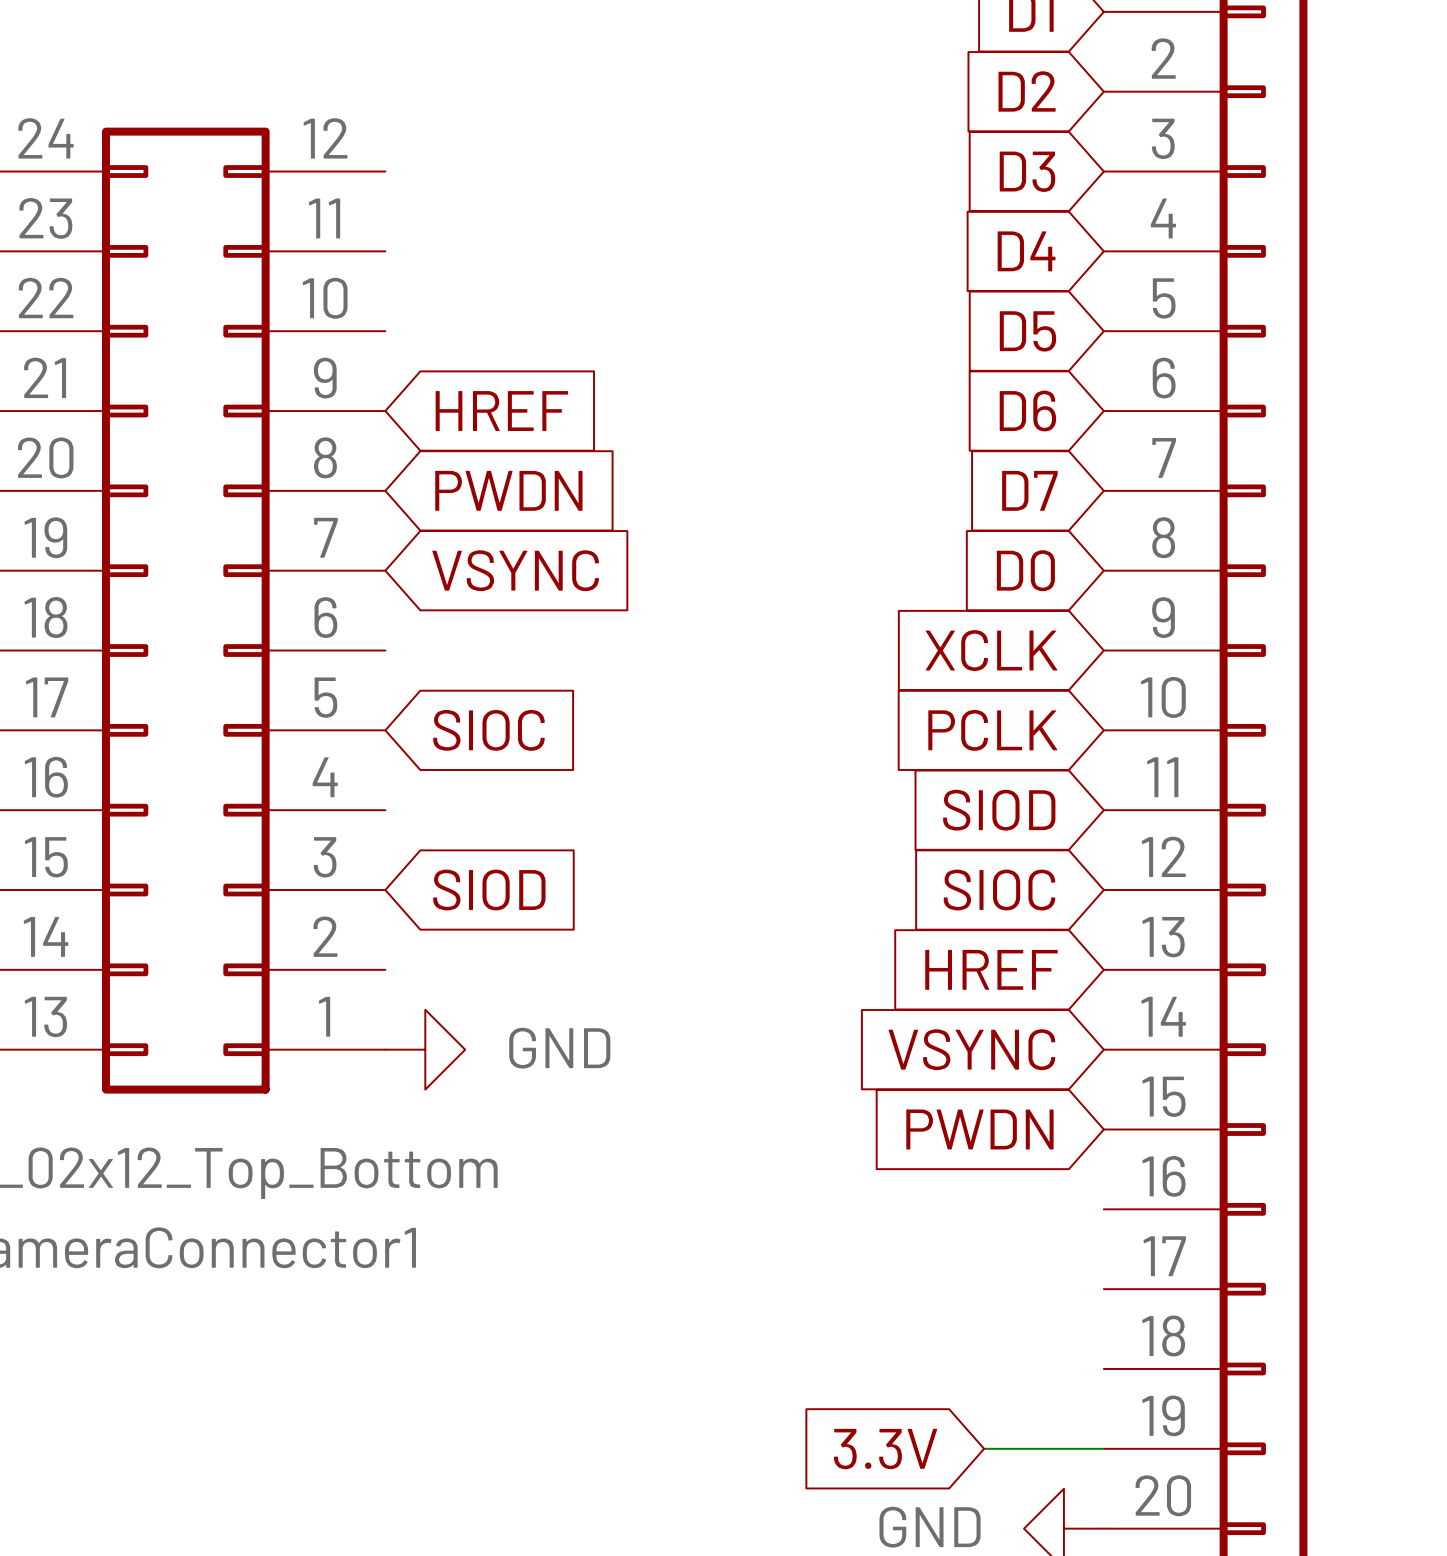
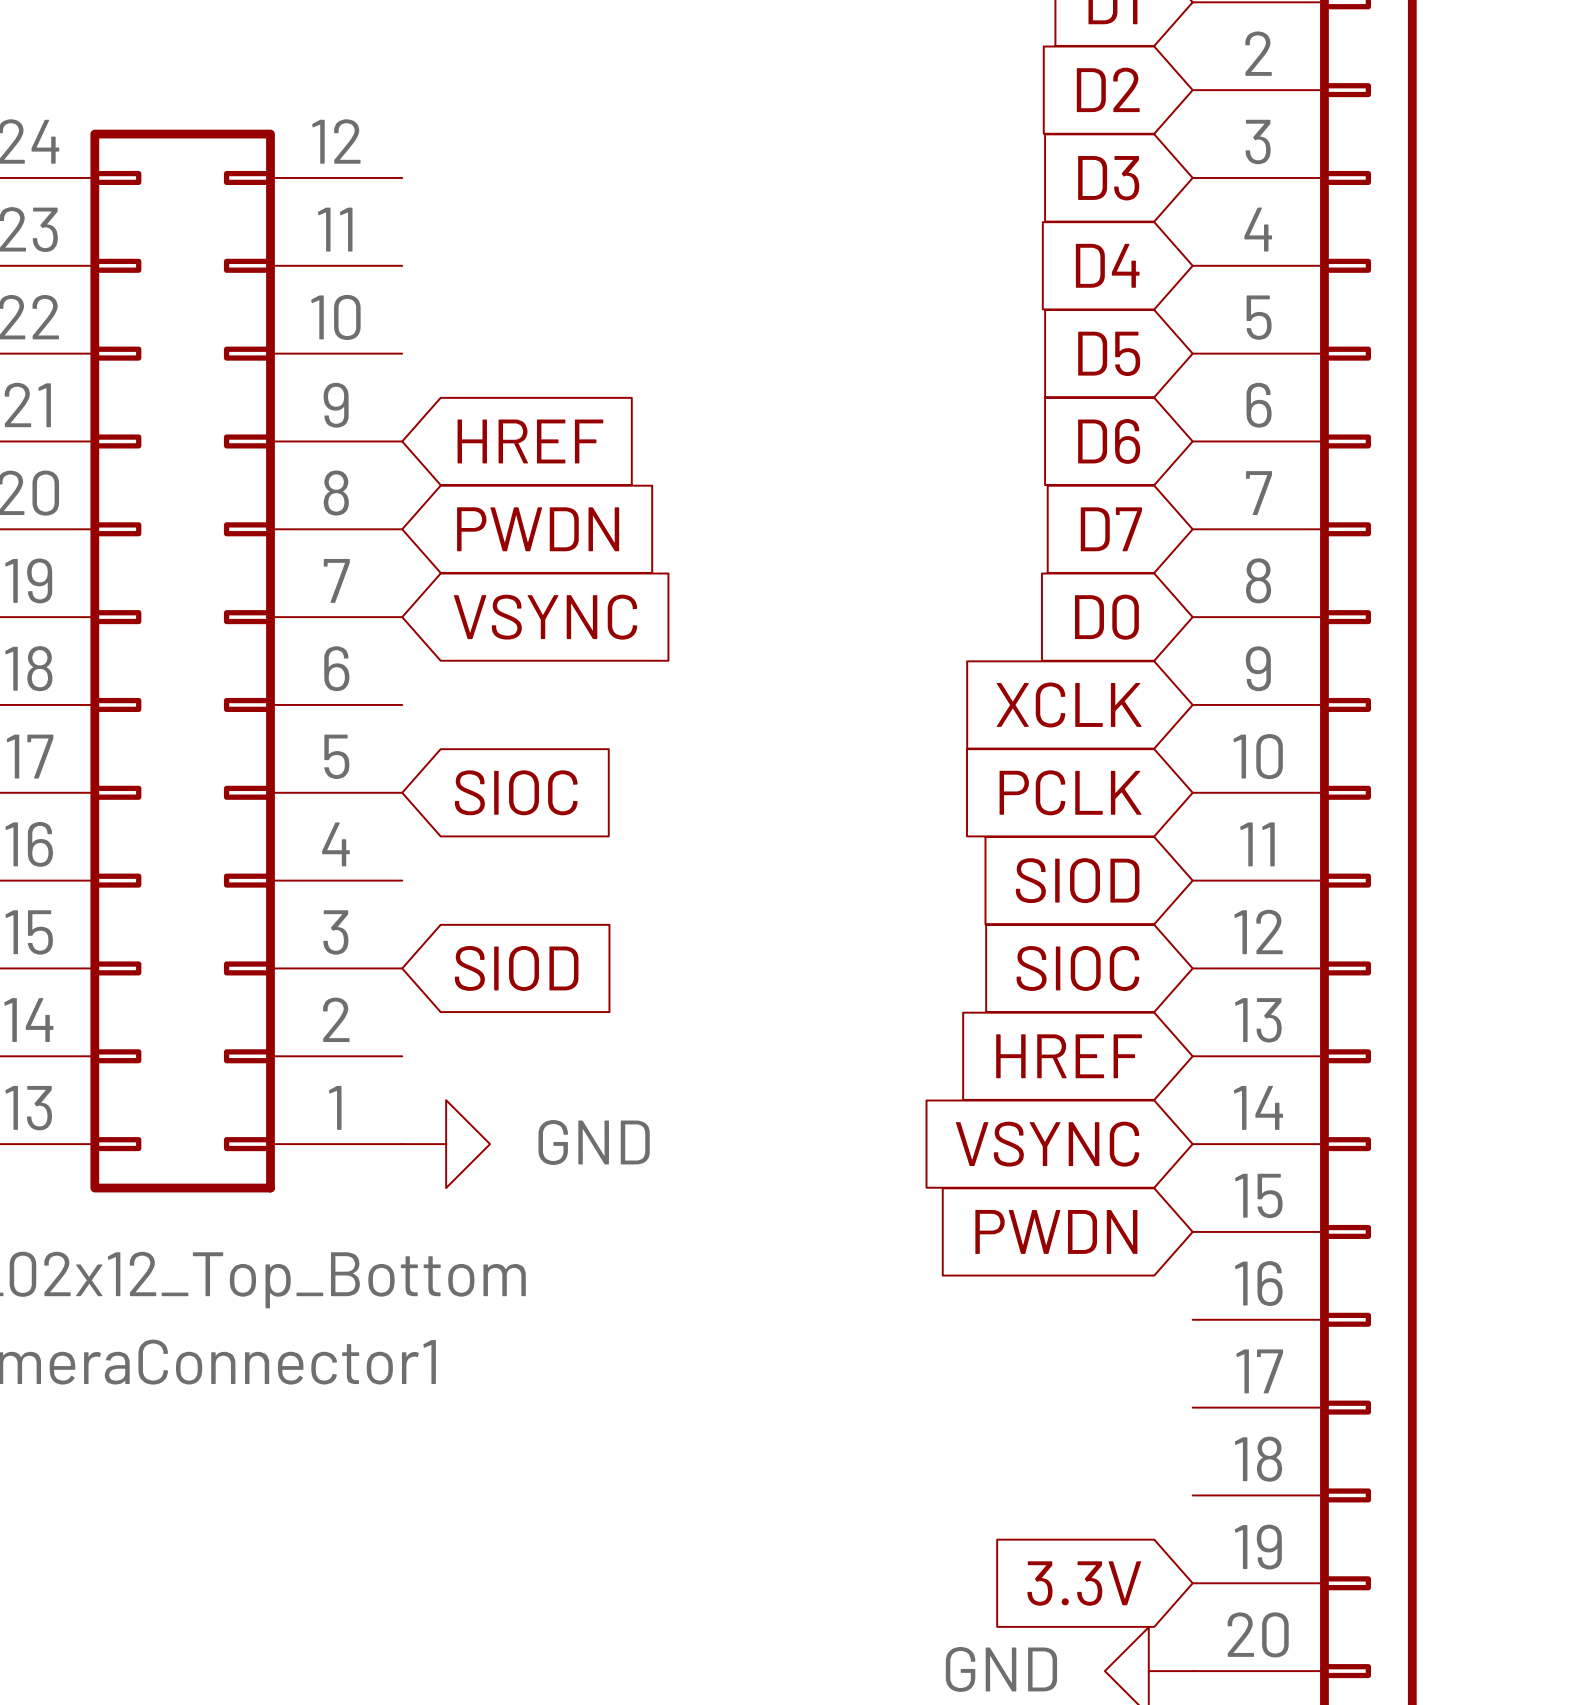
wire: (984, 1448) (1103, 1448) -> none
global label position: 3.3V (885, 1449) -> 3.3V (1084, 1583)

